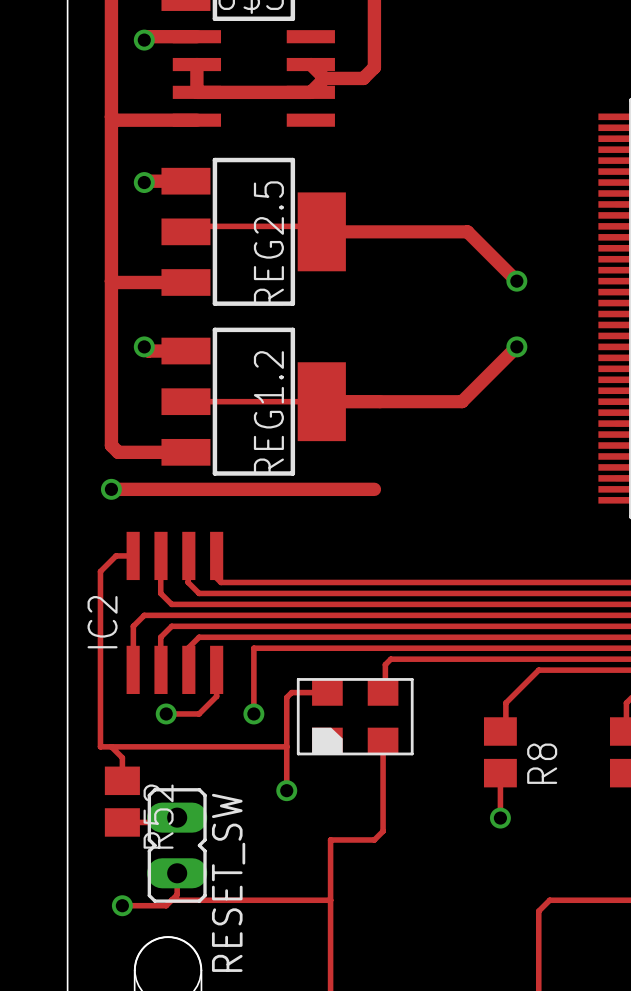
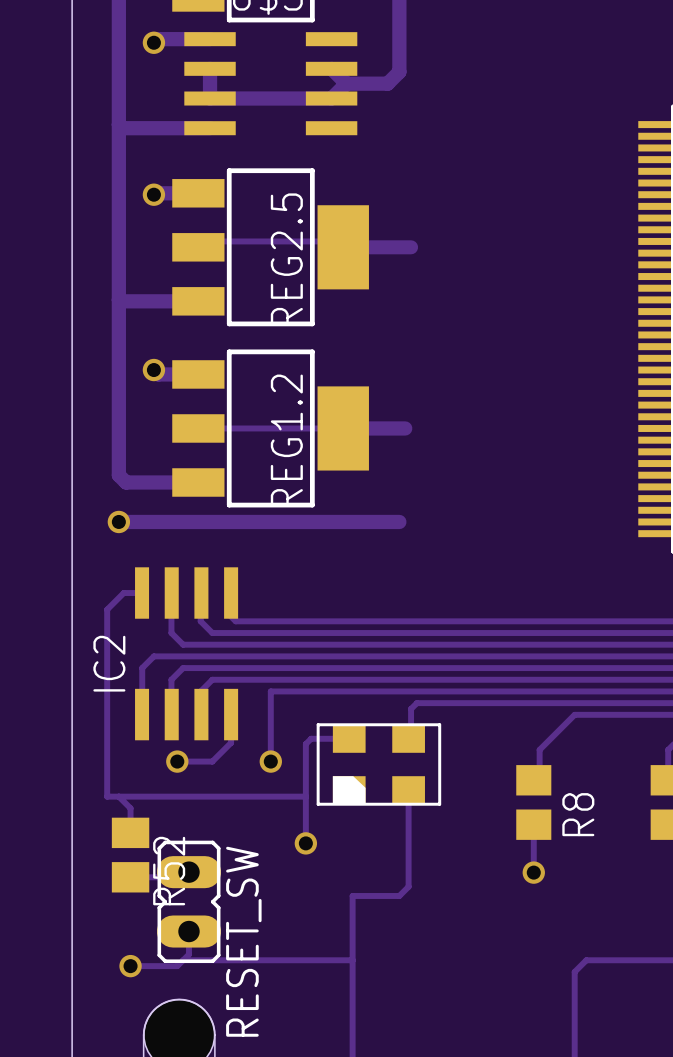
track: (385, 231) (467, 231) (516, 281) -> none
via: (516, 281) -> none
track: (516, 346) (462, 401) (379, 401) -> none
via: (516, 346) -> none

